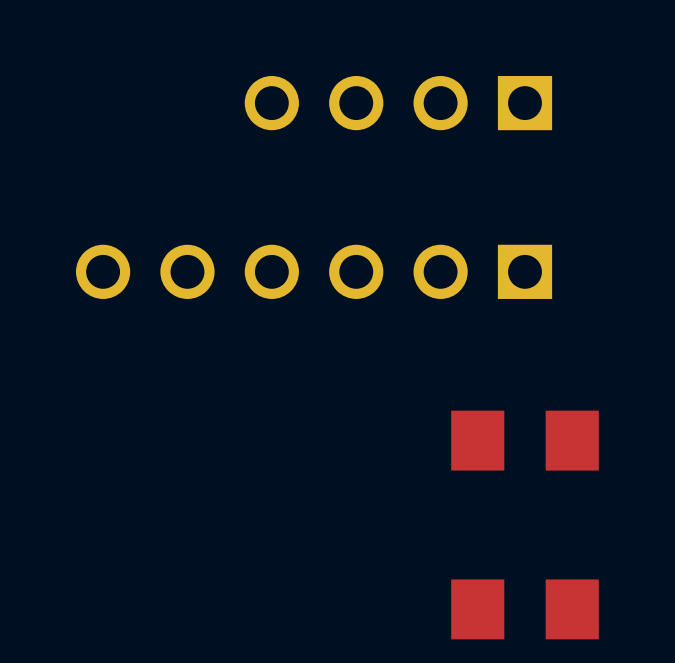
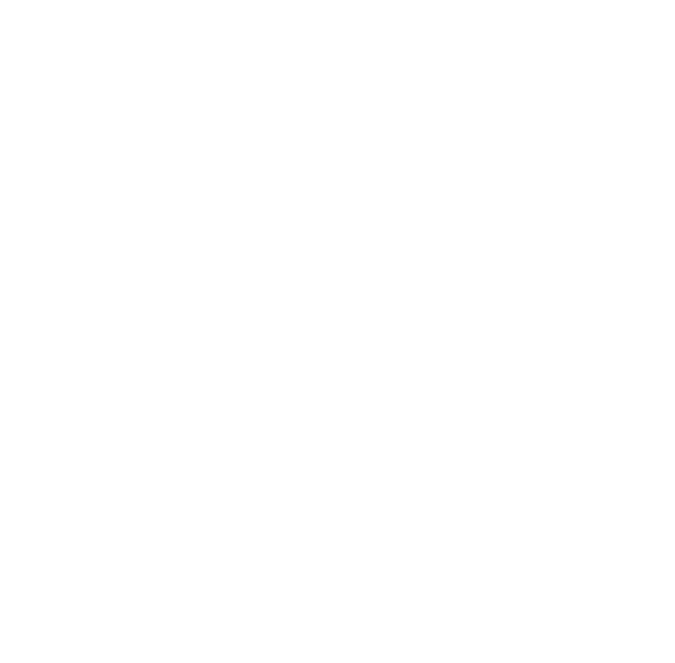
part: (398, 103) -> none
part: (314, 271) -> none
part: (525, 440) -> none
part: (525, 609) -> none

